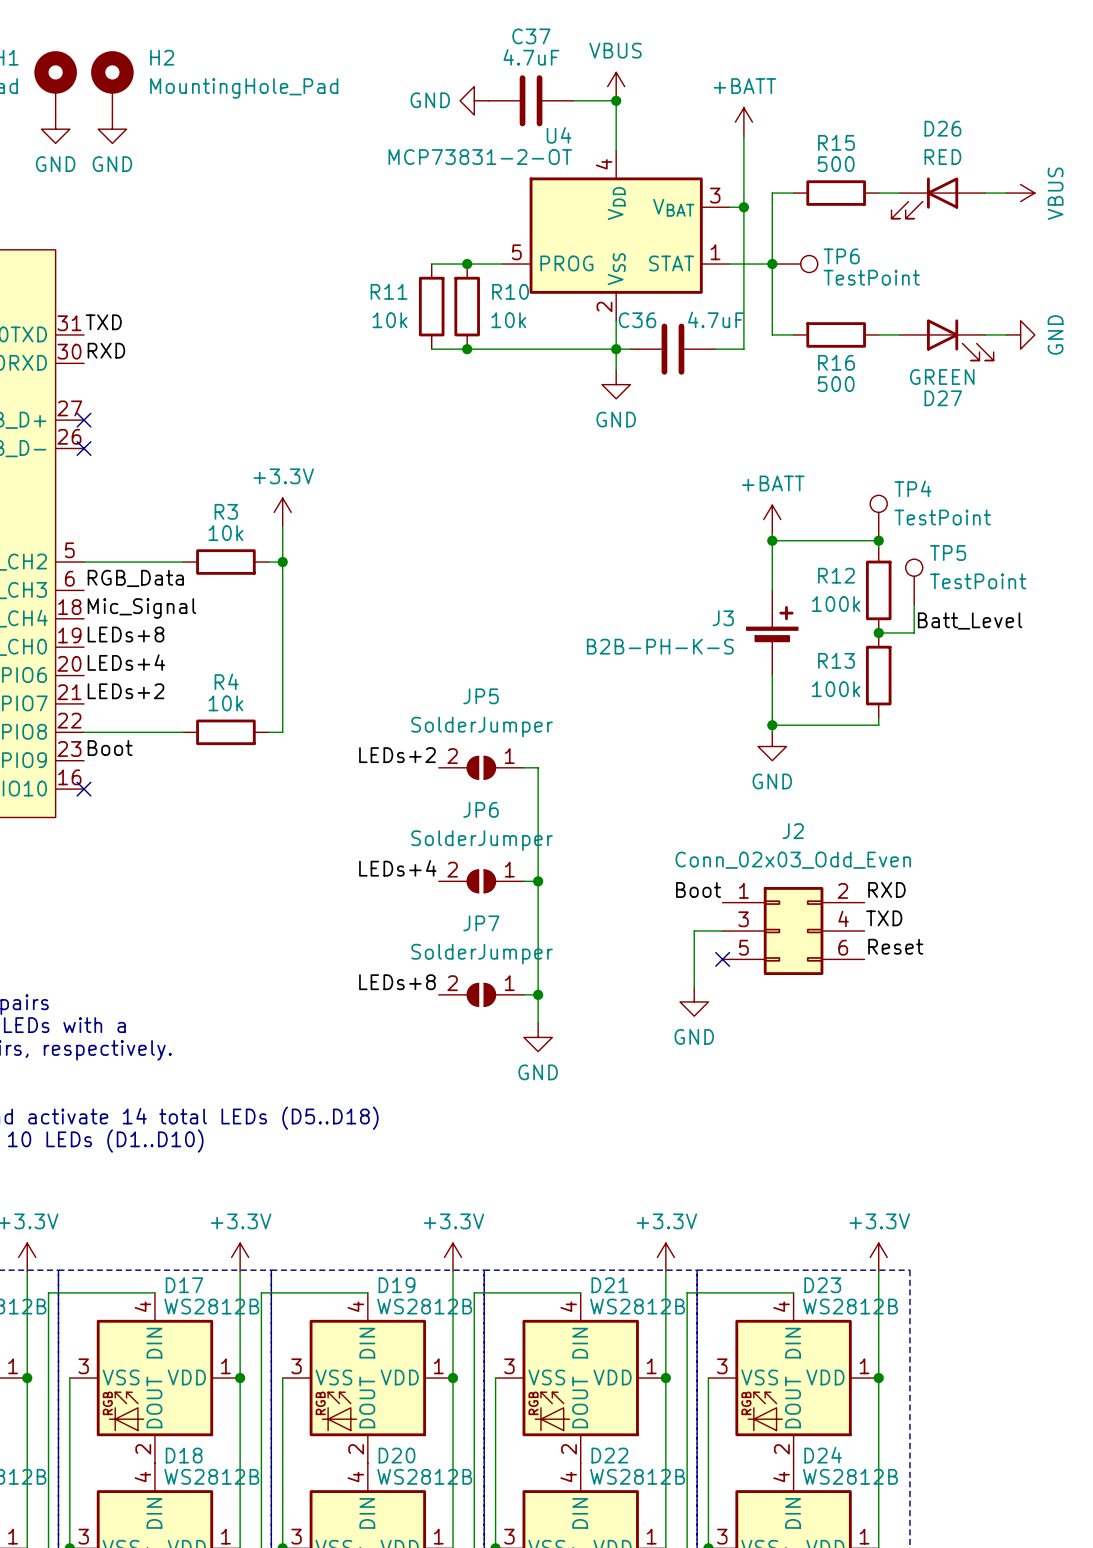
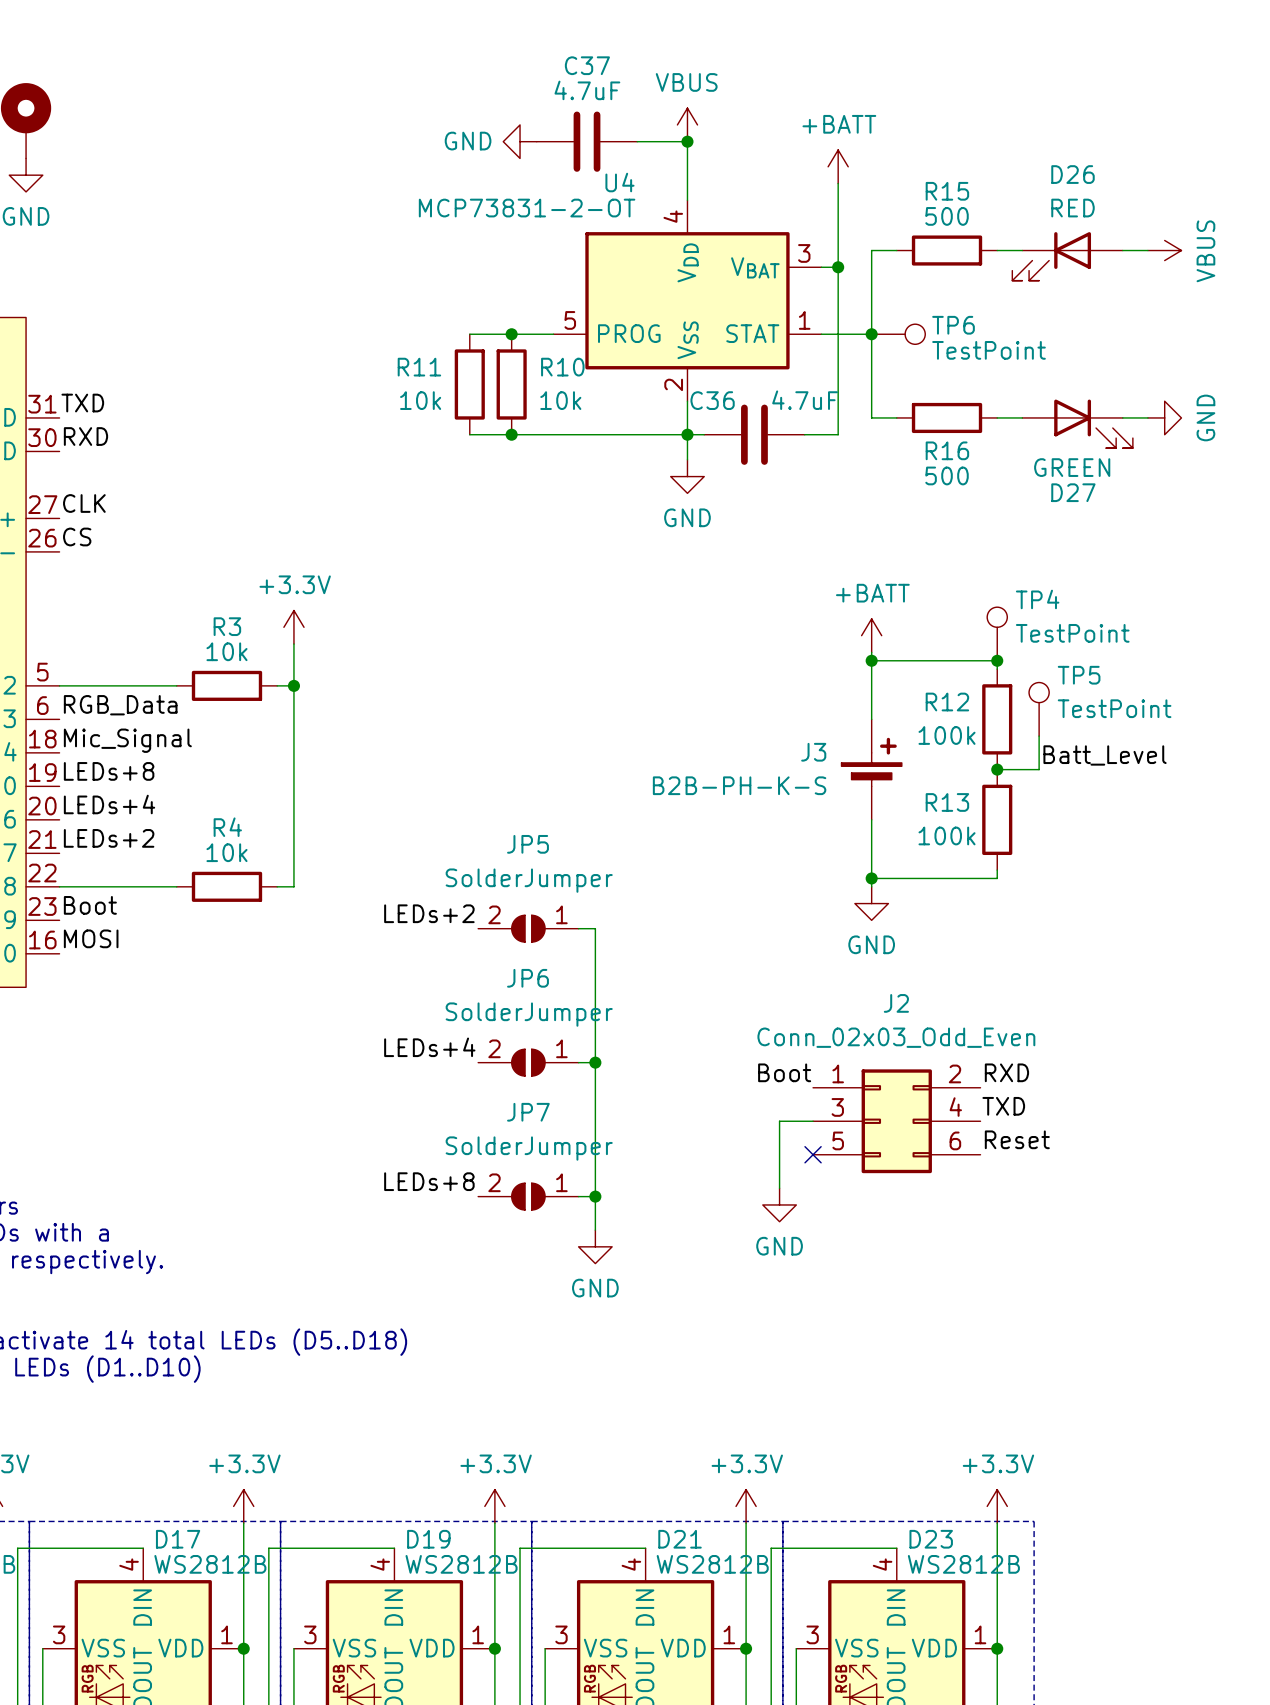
H2: MountingHole_Pad (112, 83) -> none
power symbol: GND (112, 129) -> none
label: none -> CLK (84, 503)
no-connect mark: (84, 420) -> none
label: none -> CS (77, 536)
no-connect mark: (84, 448) -> none
label: none -> MOSI (91, 938)
no-connect mark: (84, 789) -> none

